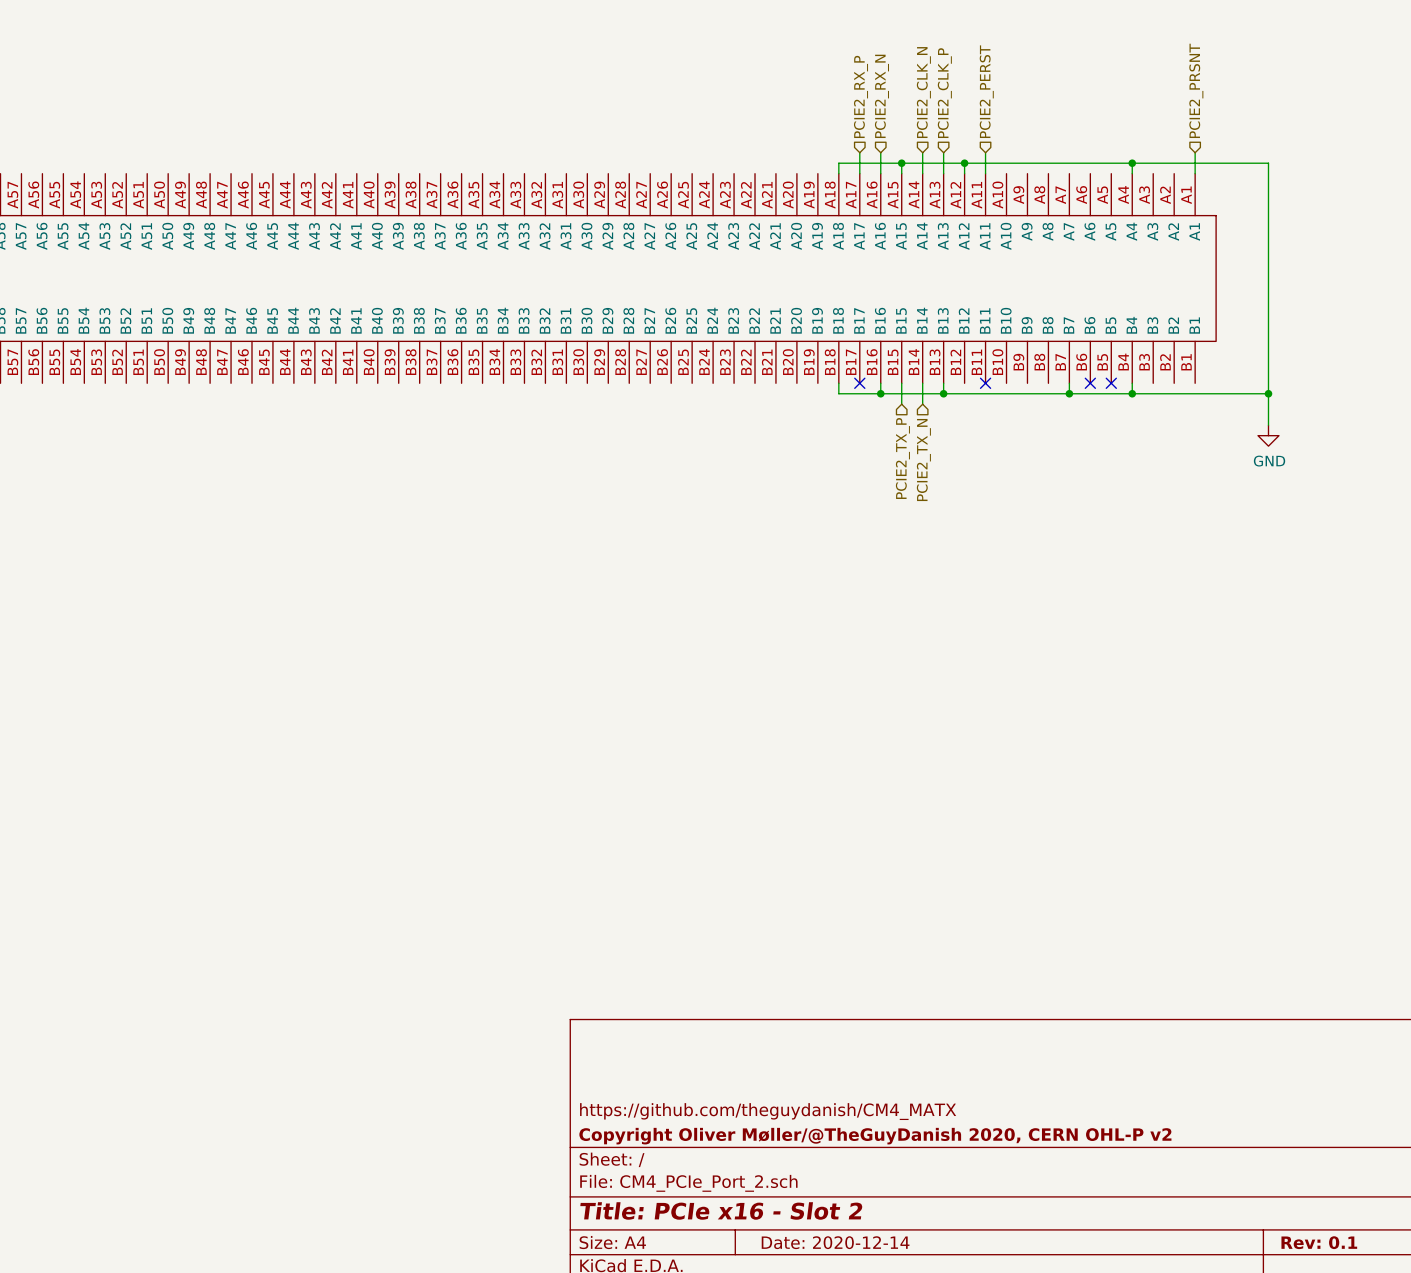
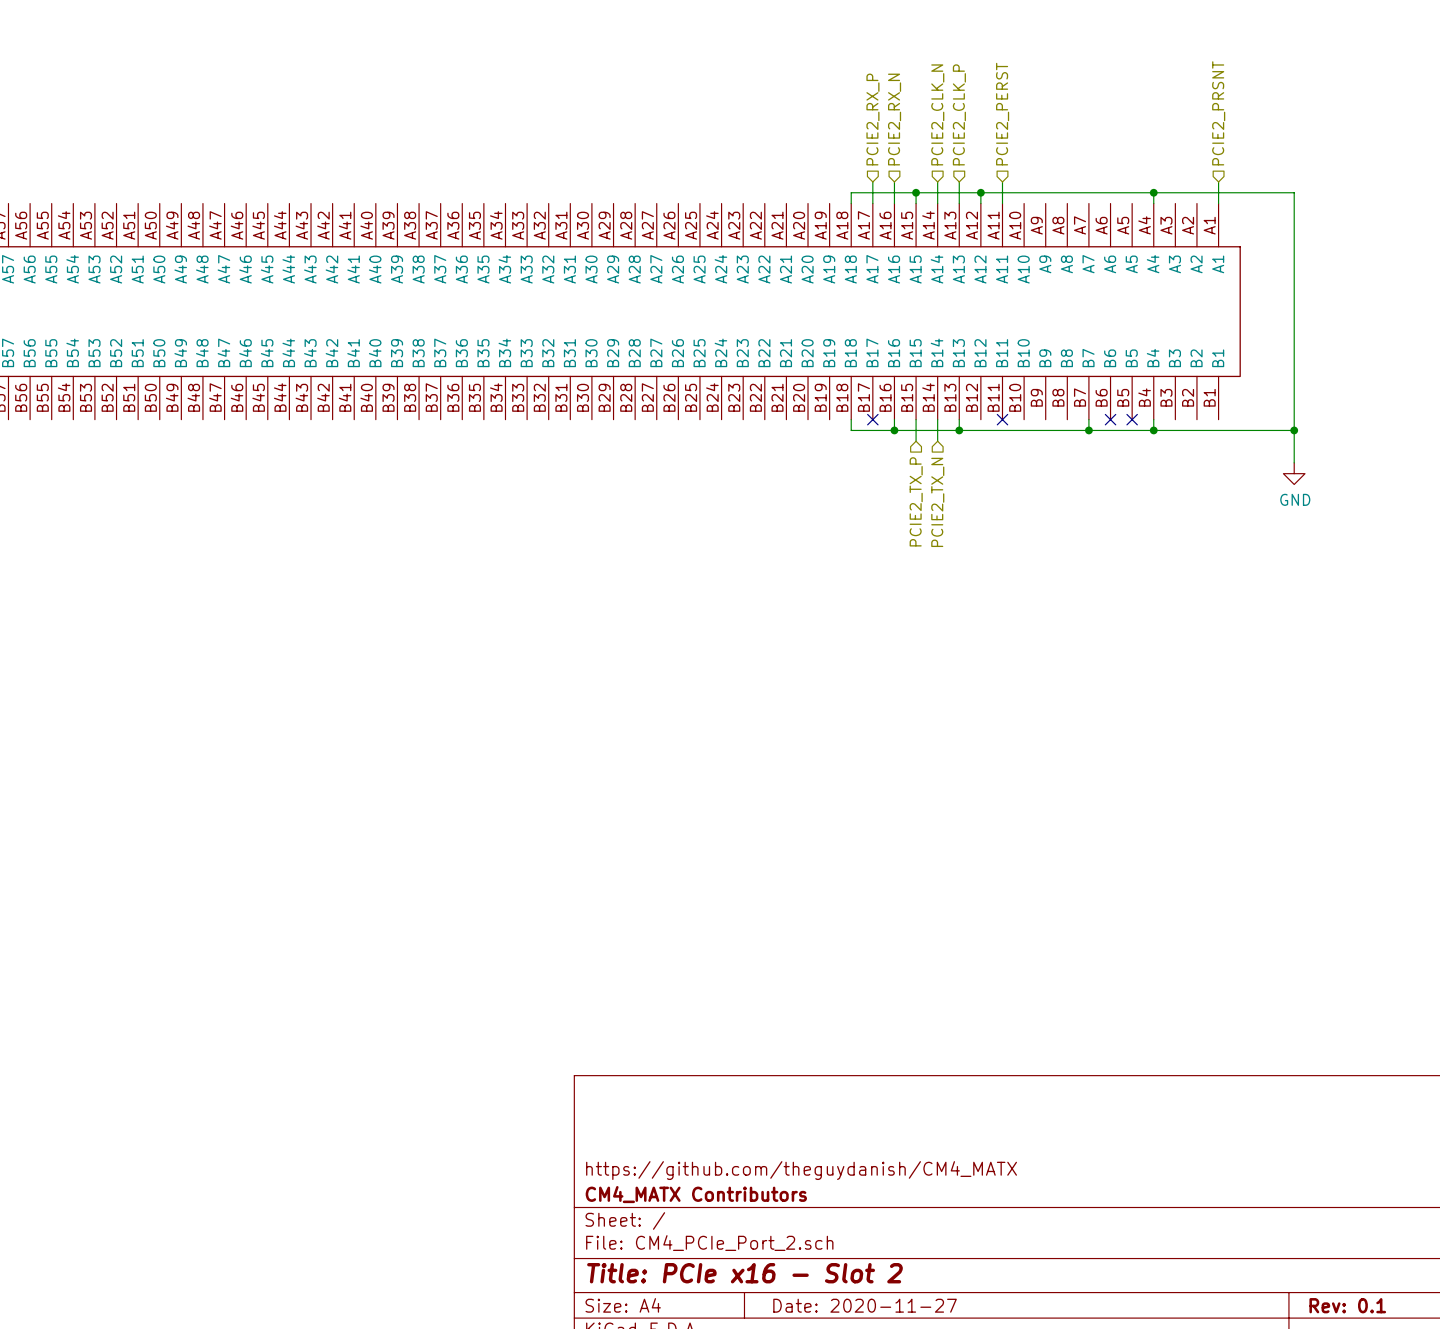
title block: Copyright Oliver Møller/@TheGuyDanish 2020, CERN OHL-P v2 (875, 1136) -> CM4_MATX Contributors (696, 1194)
title block: Date: 2020-12-14 (835, 1242) -> Date: 2020-11-27 (865, 1305)

